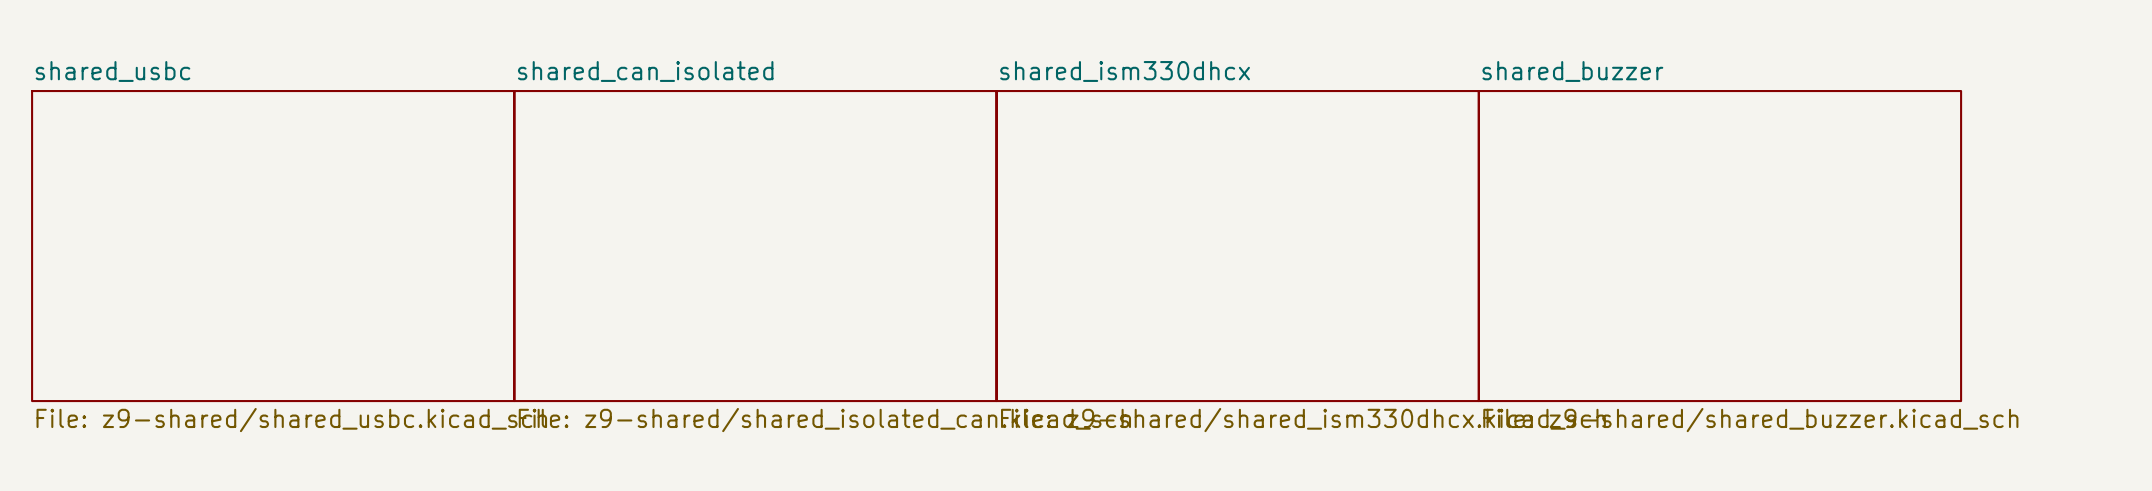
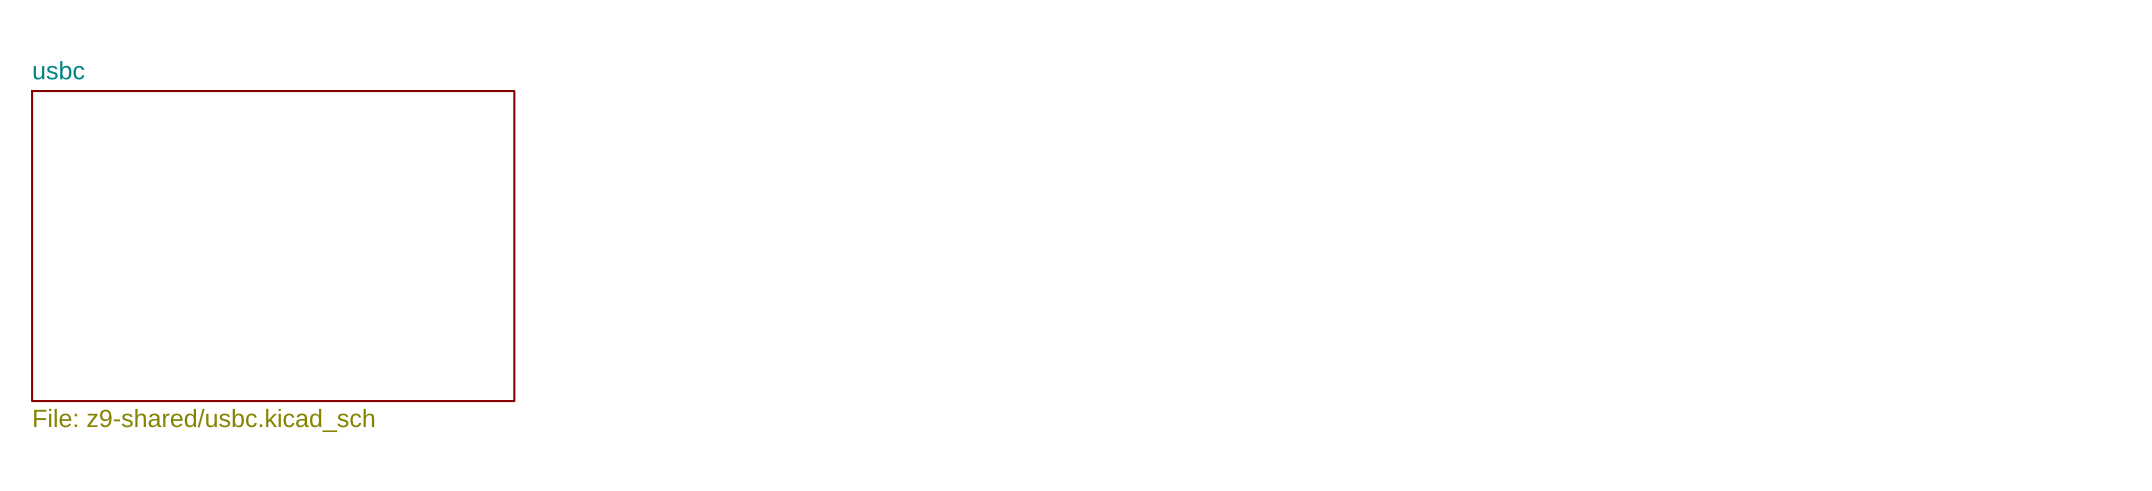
sheet shared_usbc name: shared_usbc (112, 71) -> usbc (59, 70)
sheet shared_can_isolated: File: z9-shared/shared_isolated_can.kicad_sch (755, 246) -> none
sheet shared_ism330dhcx: File: z9-shared/shared_ism330dhcx.kicad_sch (1237, 246) -> none
sheet shared_buzzer: File: z9-shared/shared_buzzer.kicad_sch (1719, 246) -> none
sheet shared_usbc value: File: z9-shared/shared_usbc.kicad_sch (291, 420) -> File: z9-shared/usbc.kicad_sch (204, 420)

